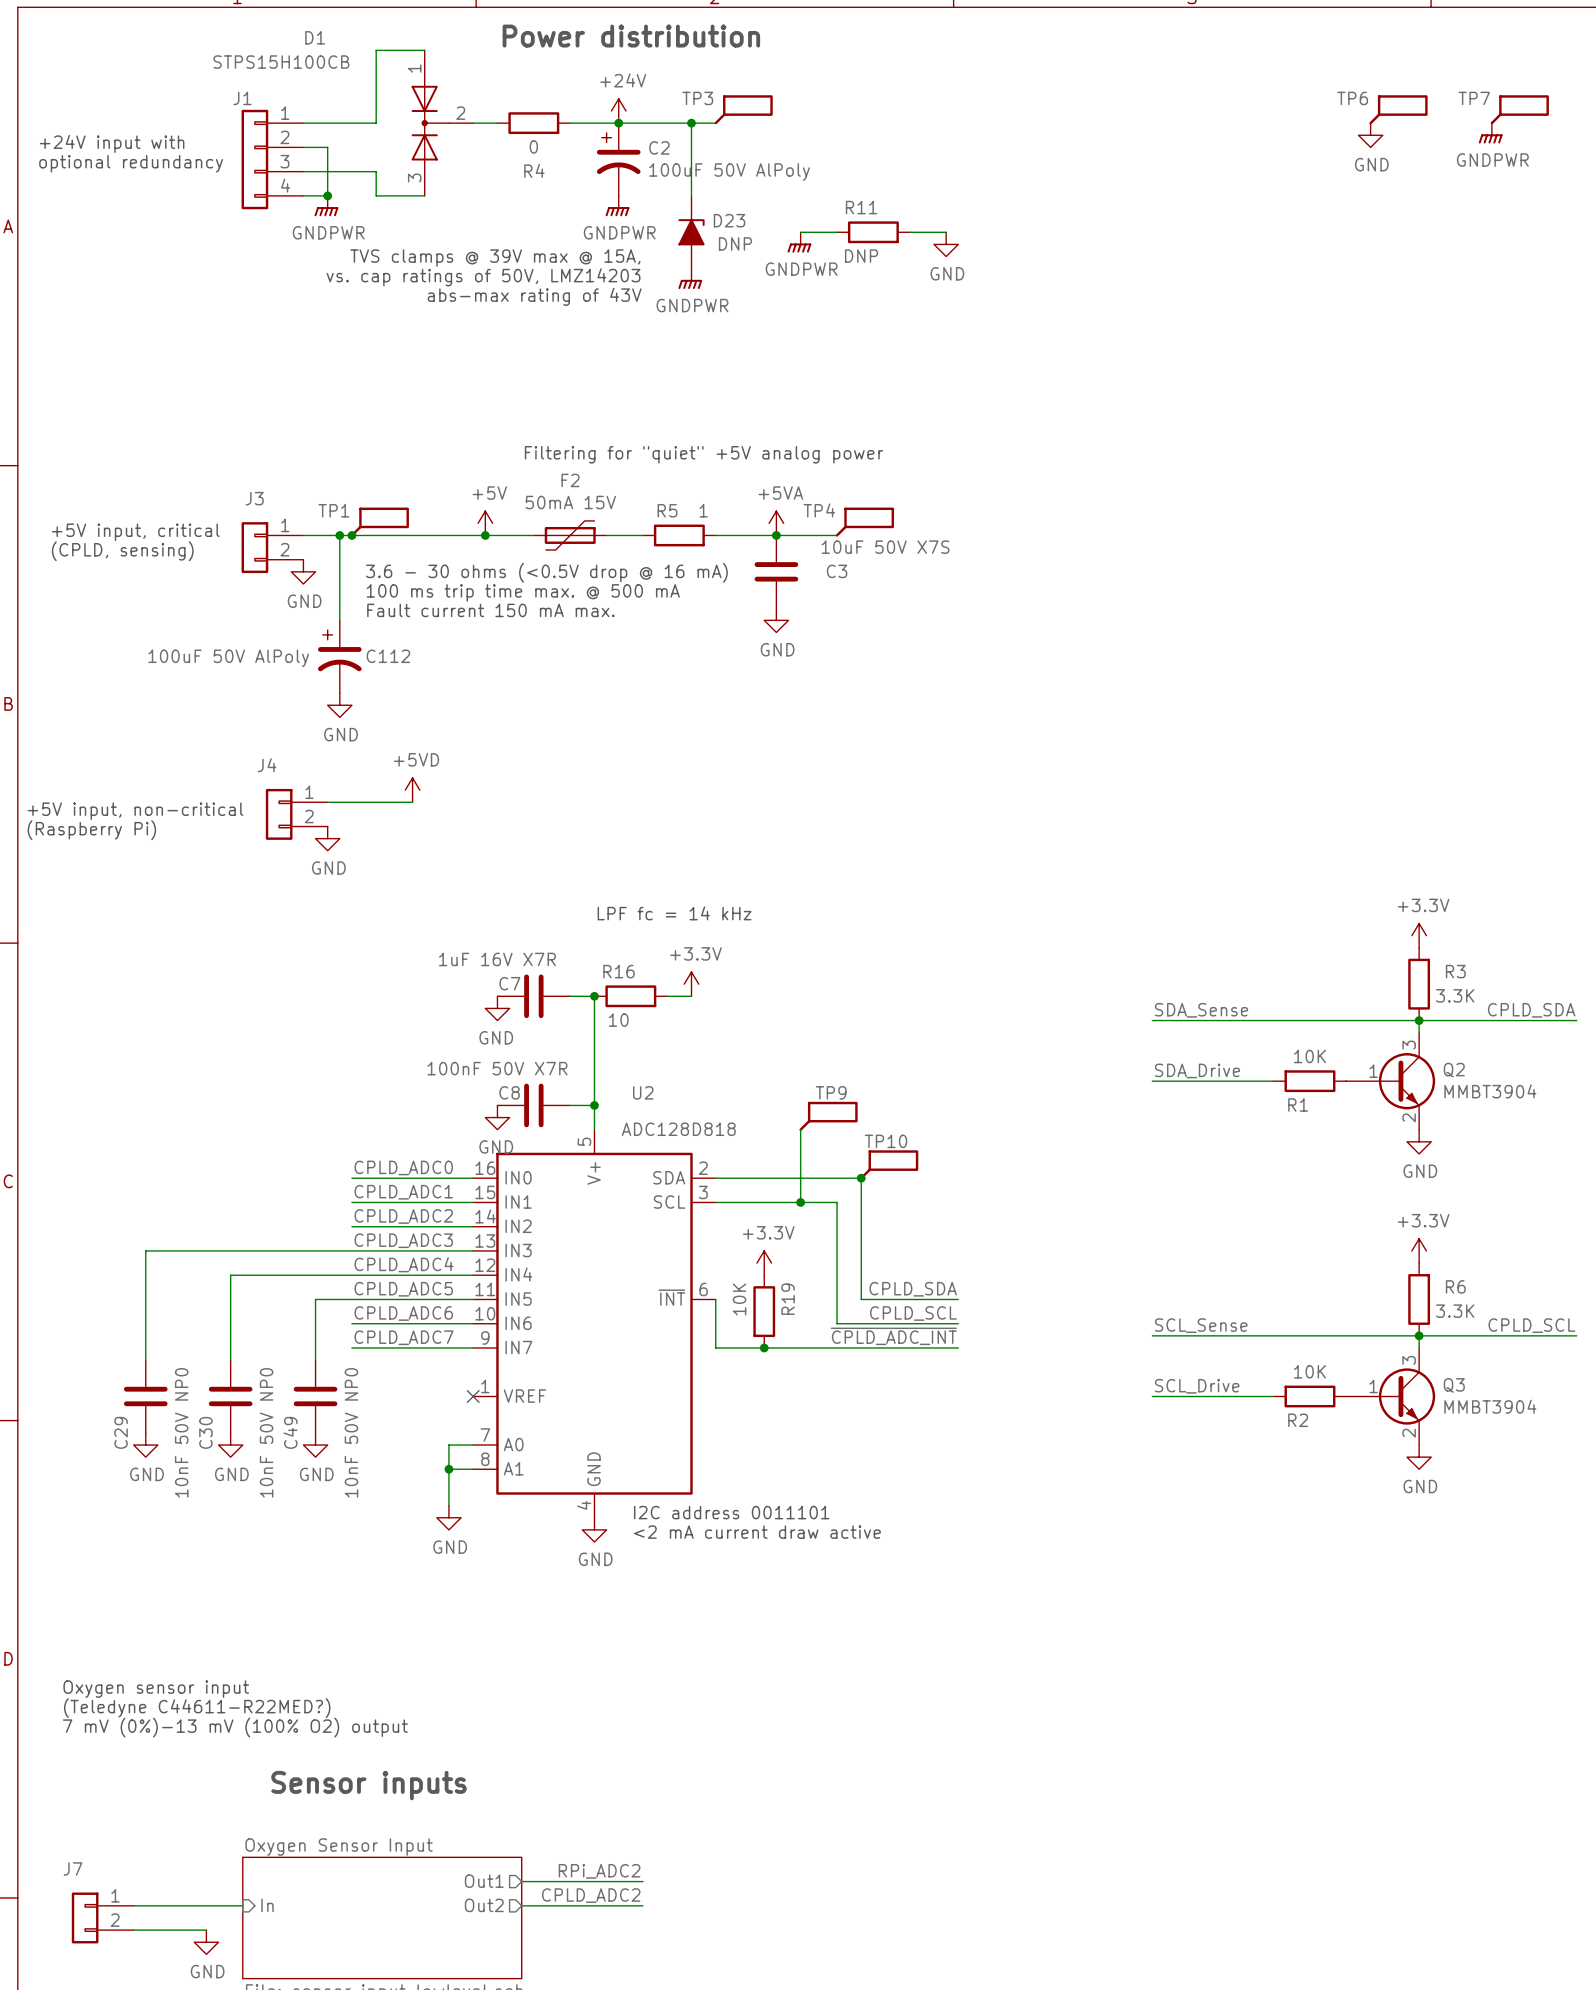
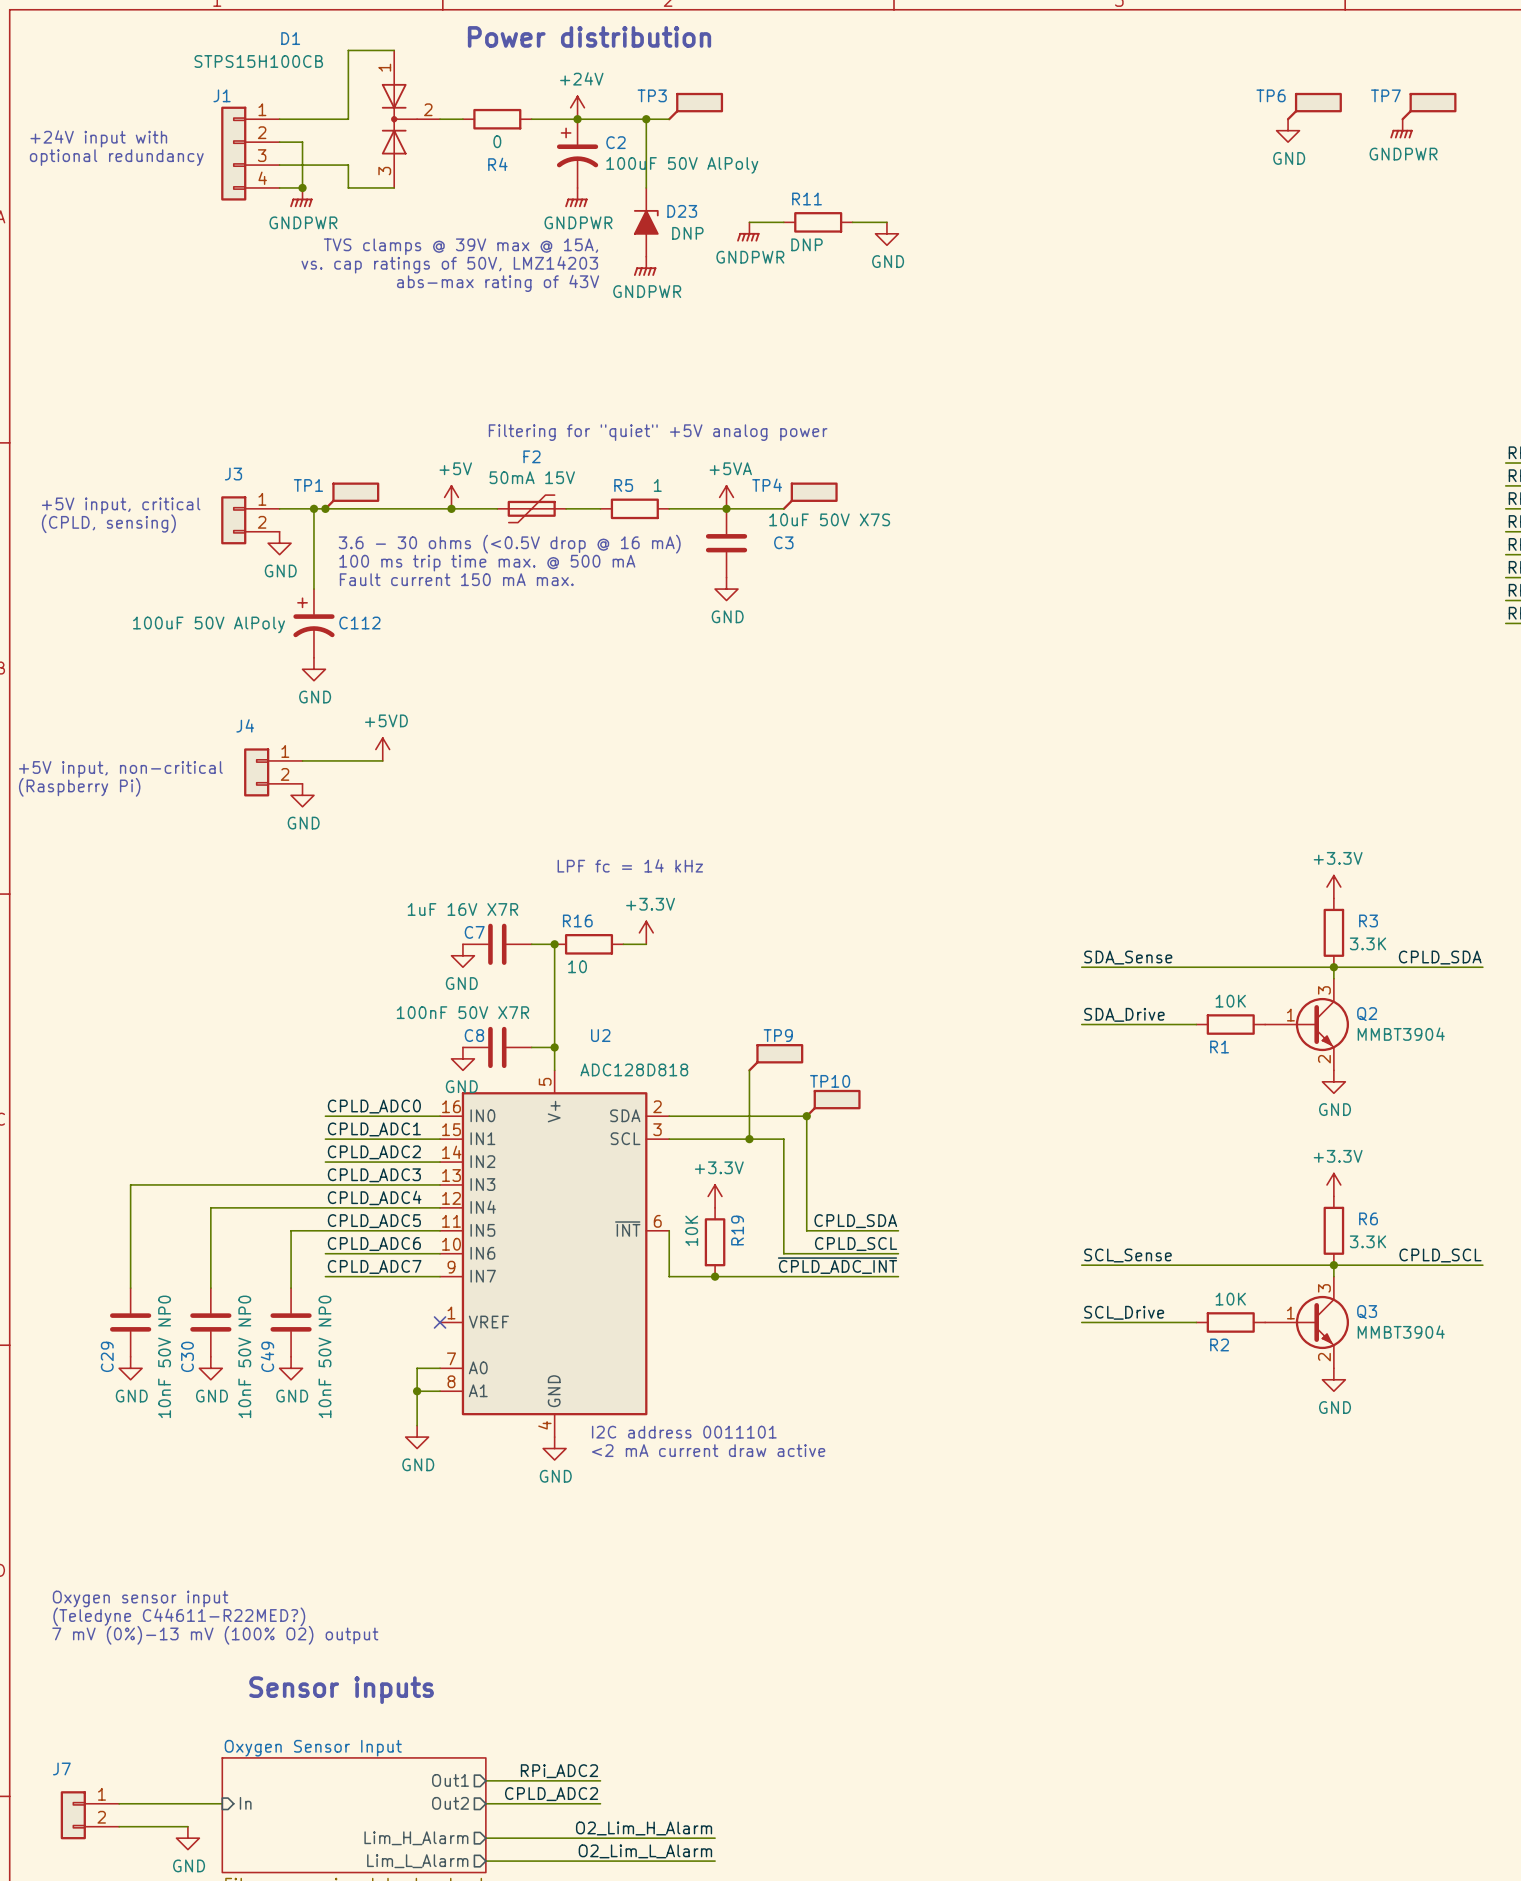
label: none -> O2_Lim_H_Alarm (644, 1828)
sheet pin: none -> Lim_H_Alarm (416, 1838)
wire: none -> (485, 1838) (715, 1838)
label: none -> O2_Lim_L_Alarm (645, 1851)
sheet pin: none -> Lim_L_Alarm (417, 1861)
wire: none -> (485, 1861) (715, 1861)

